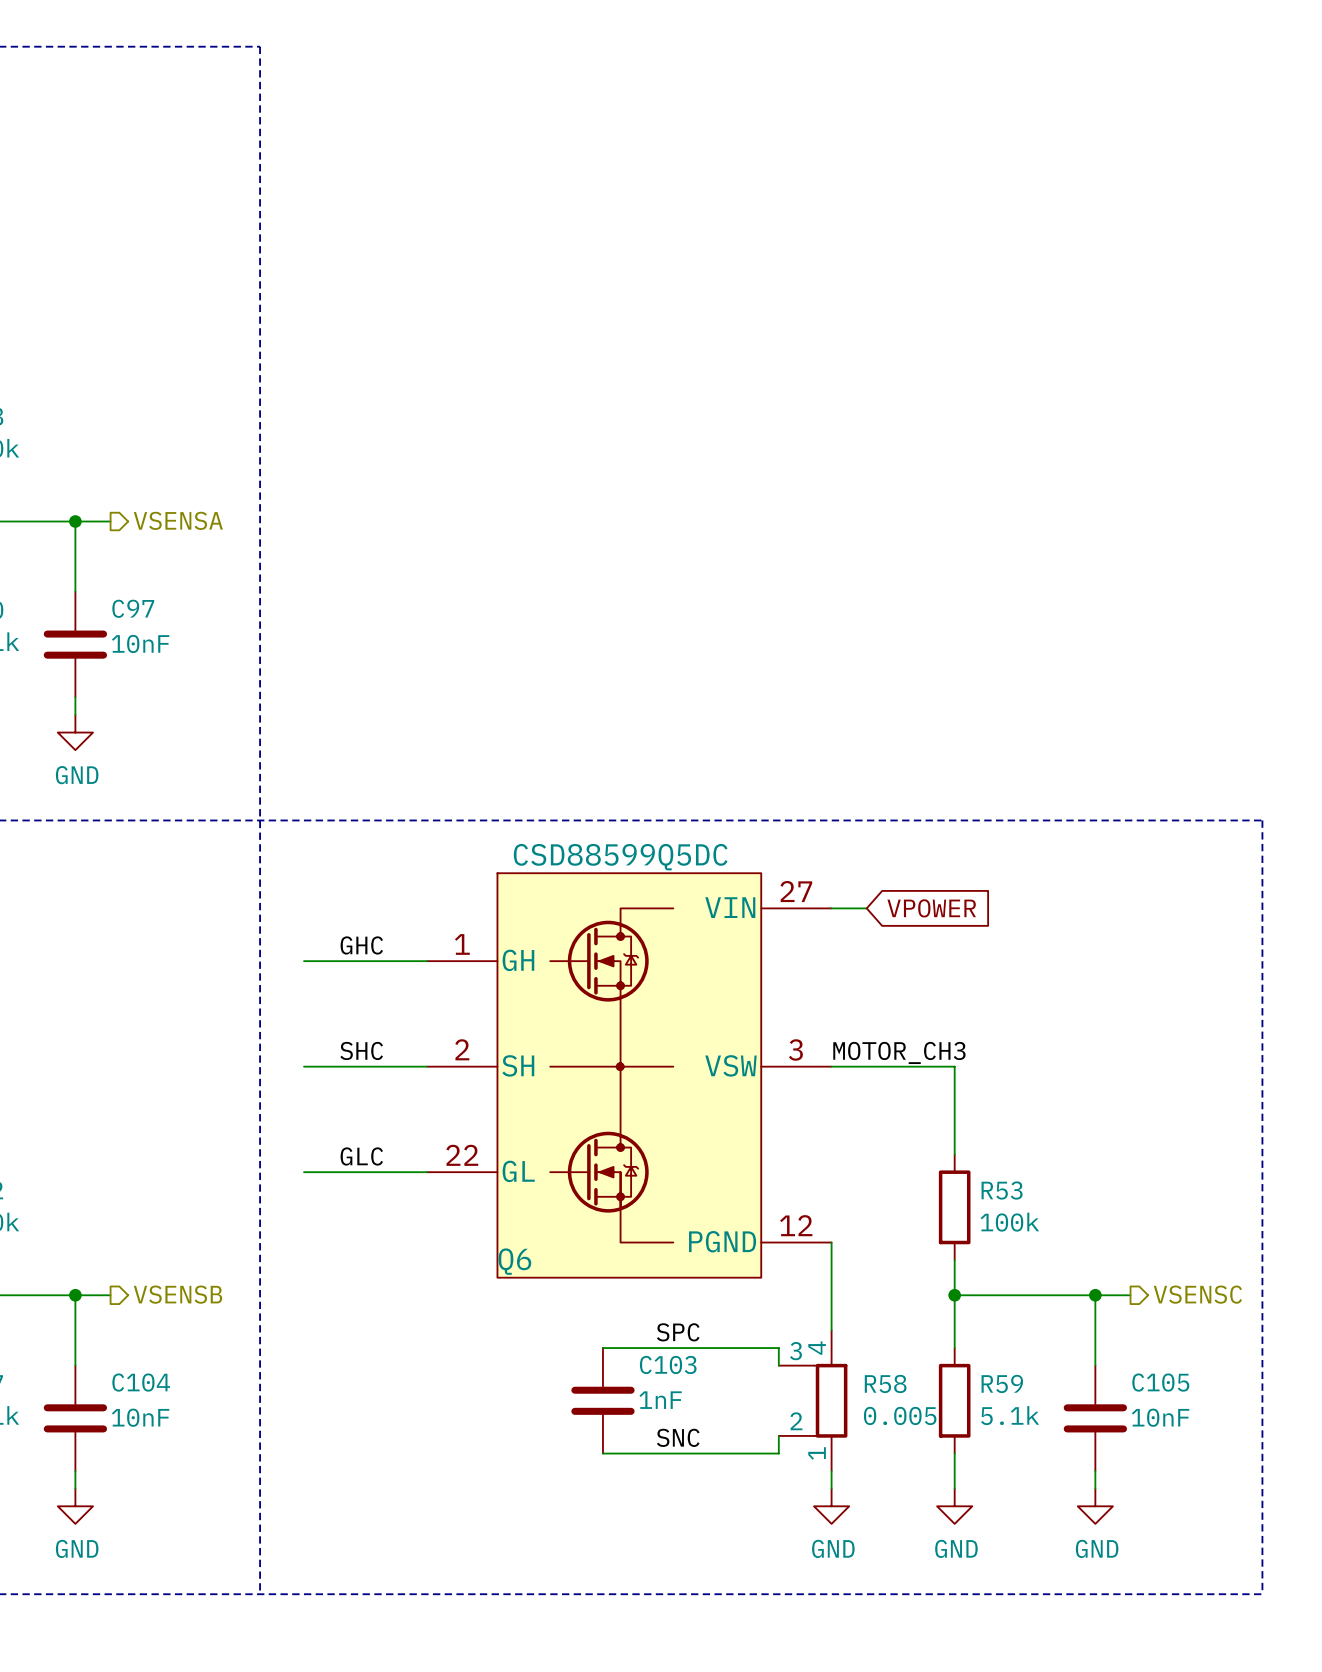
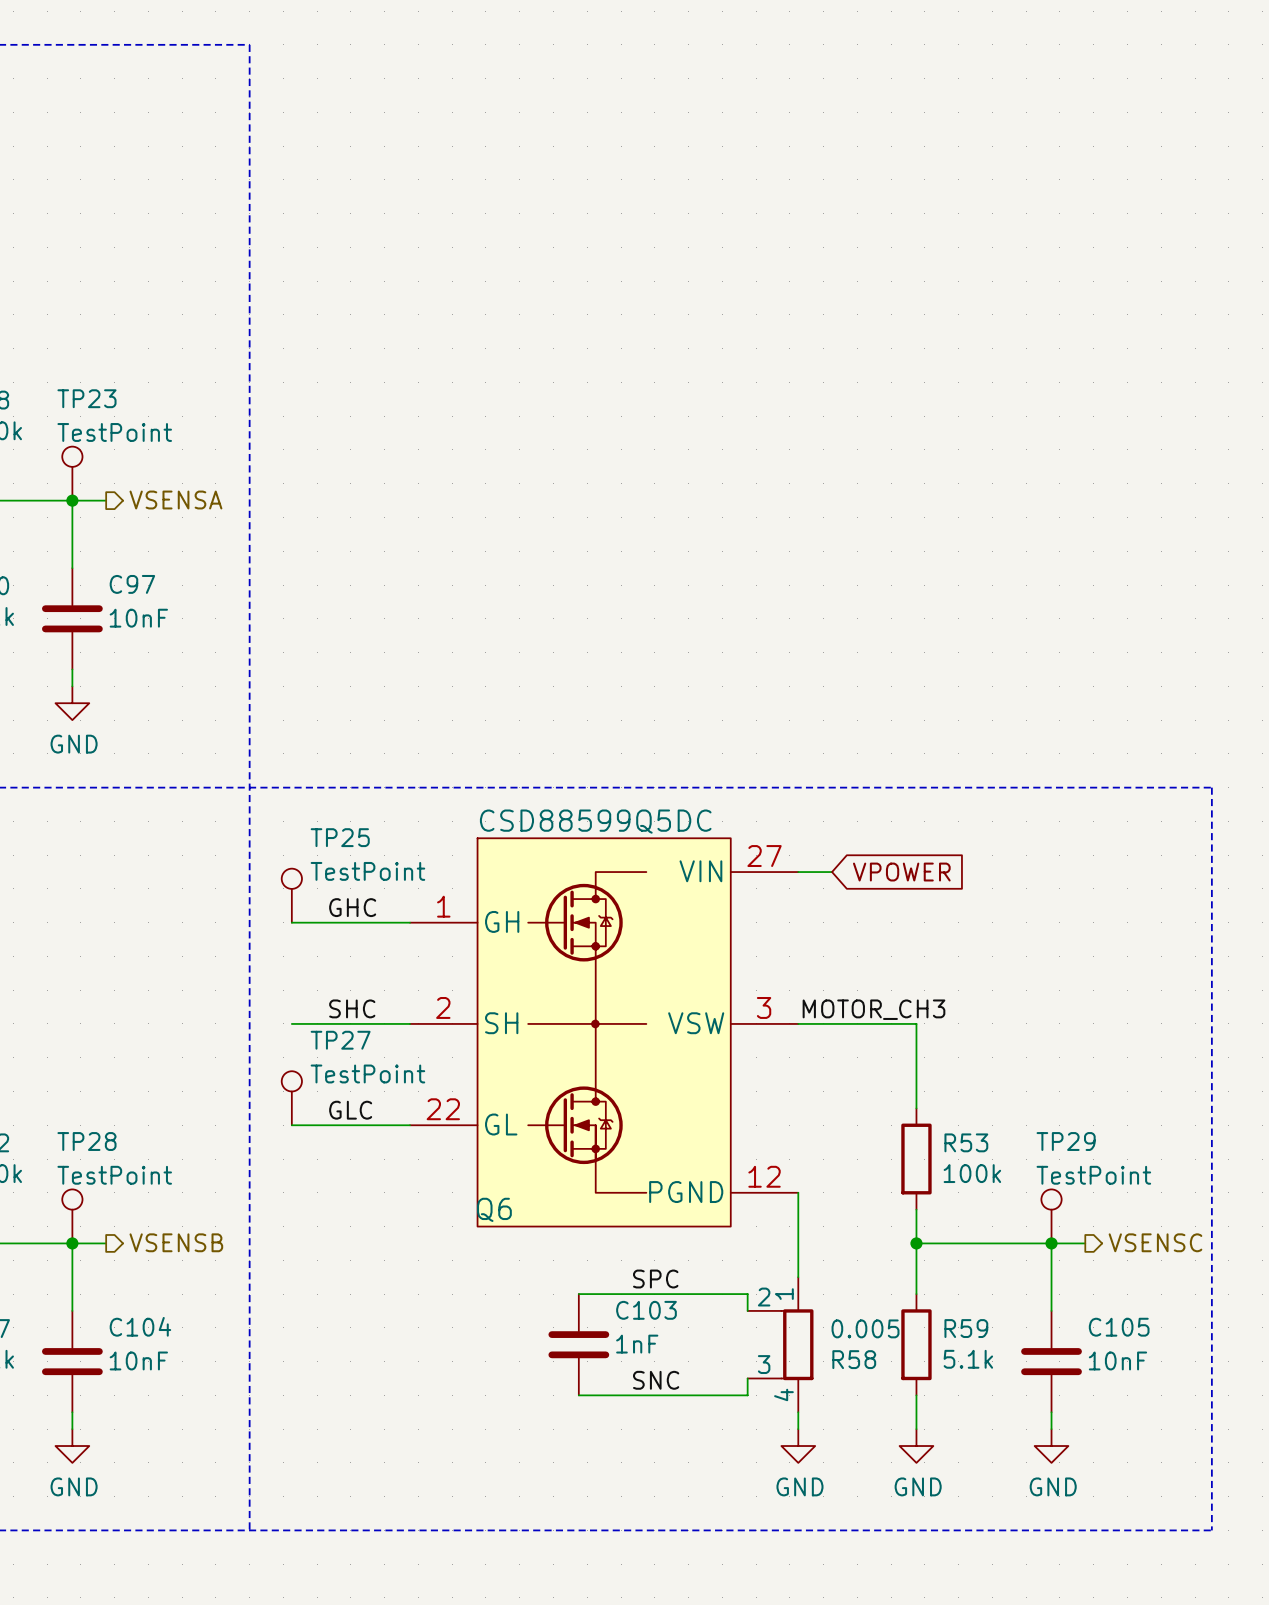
TP23: none -> TestPoint (72, 473)
TP25: none -> TestPoint (291, 895)
TP27: none -> TestPoint (291, 1098)
TP28: none -> TestPoint (72, 1216)
TP29: none -> TestPoint (1051, 1216)
R58 flip: as is (830, 1400) -> up-down (797, 1344)

